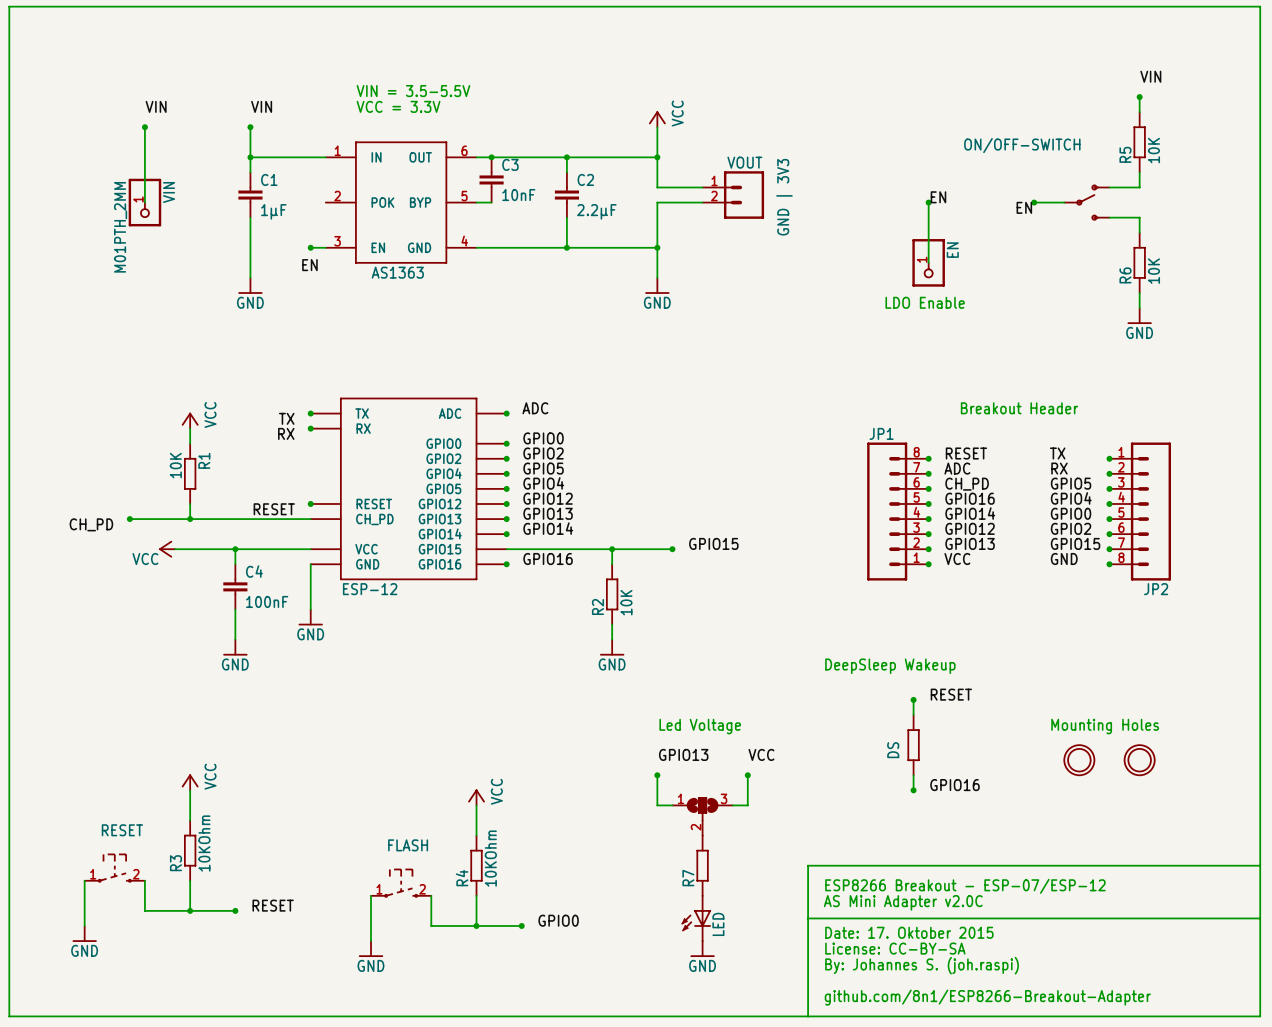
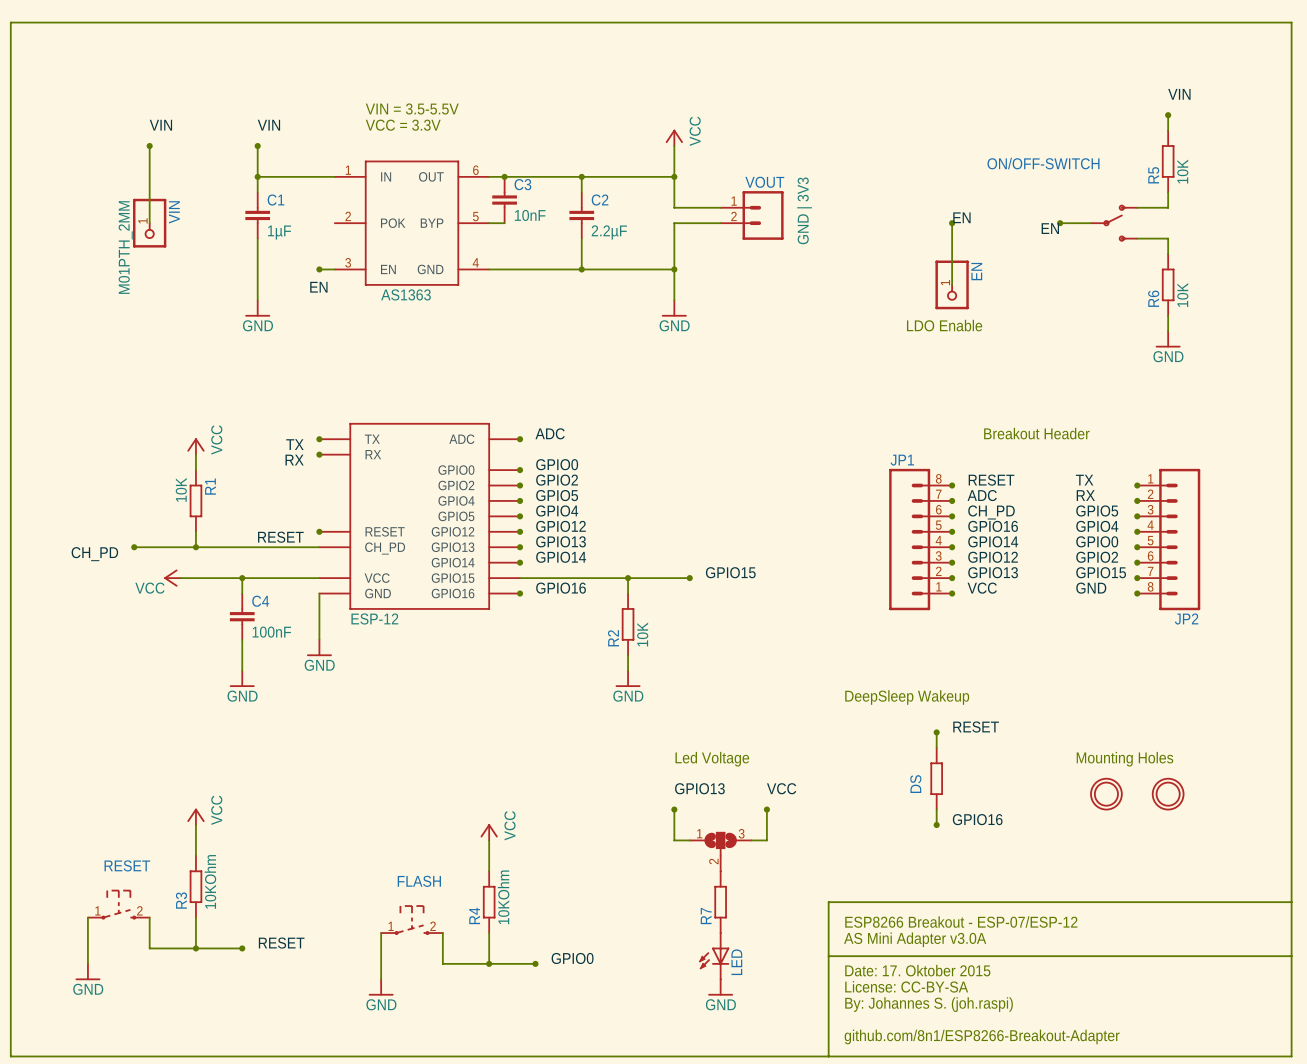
text: AS Mini Adapter v2.0C (903, 902) -> AS Mini Adapter v3.0A (915, 939)

